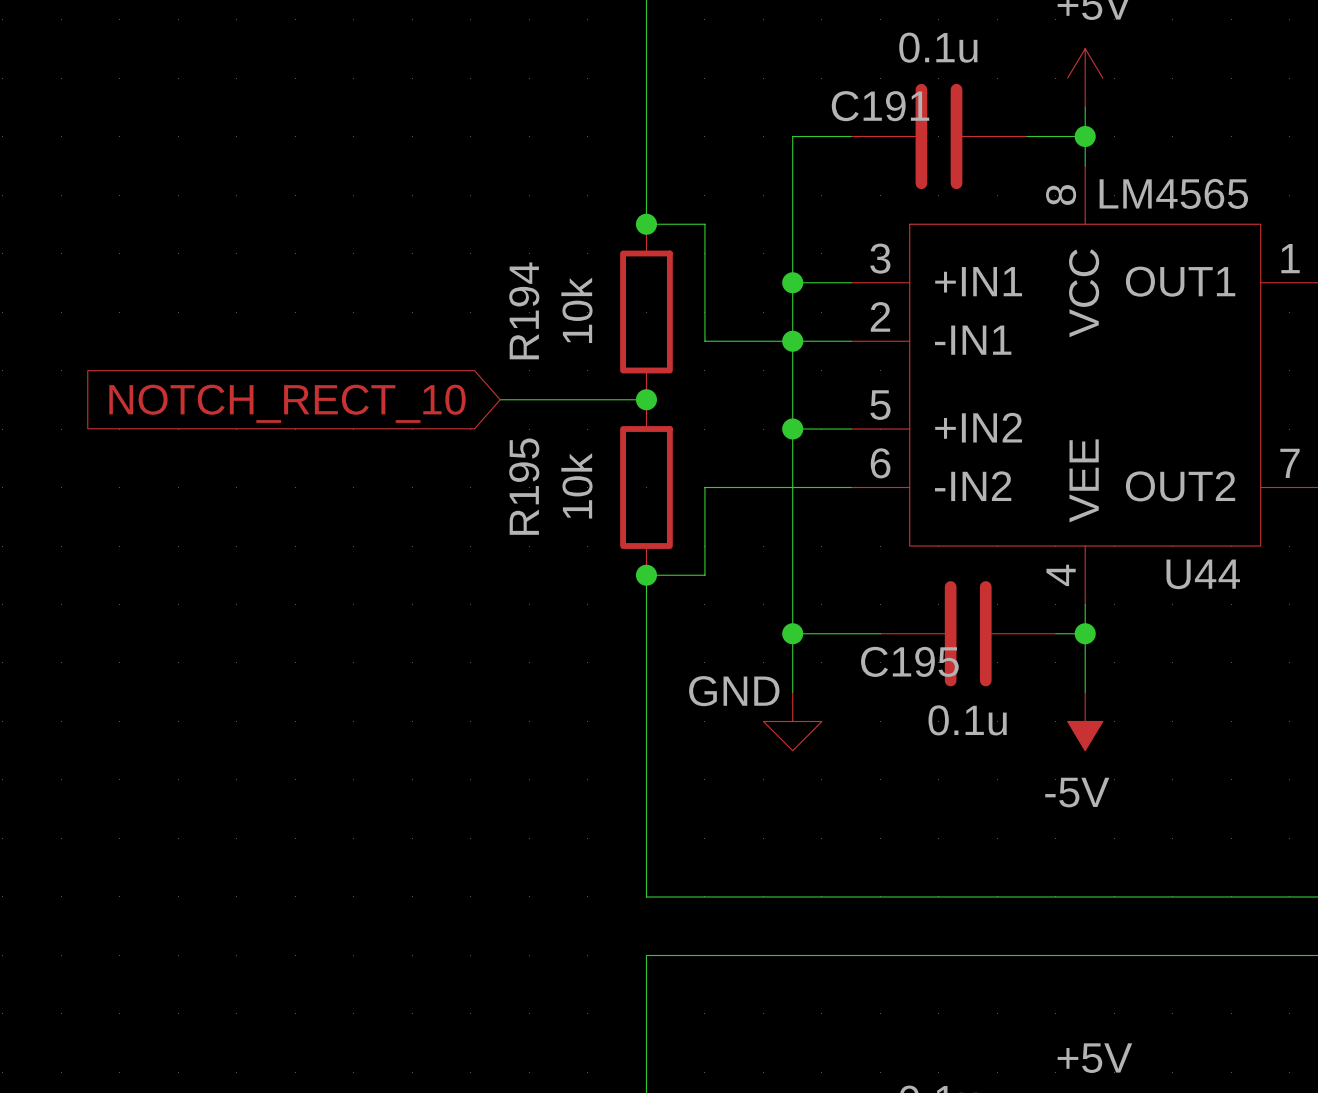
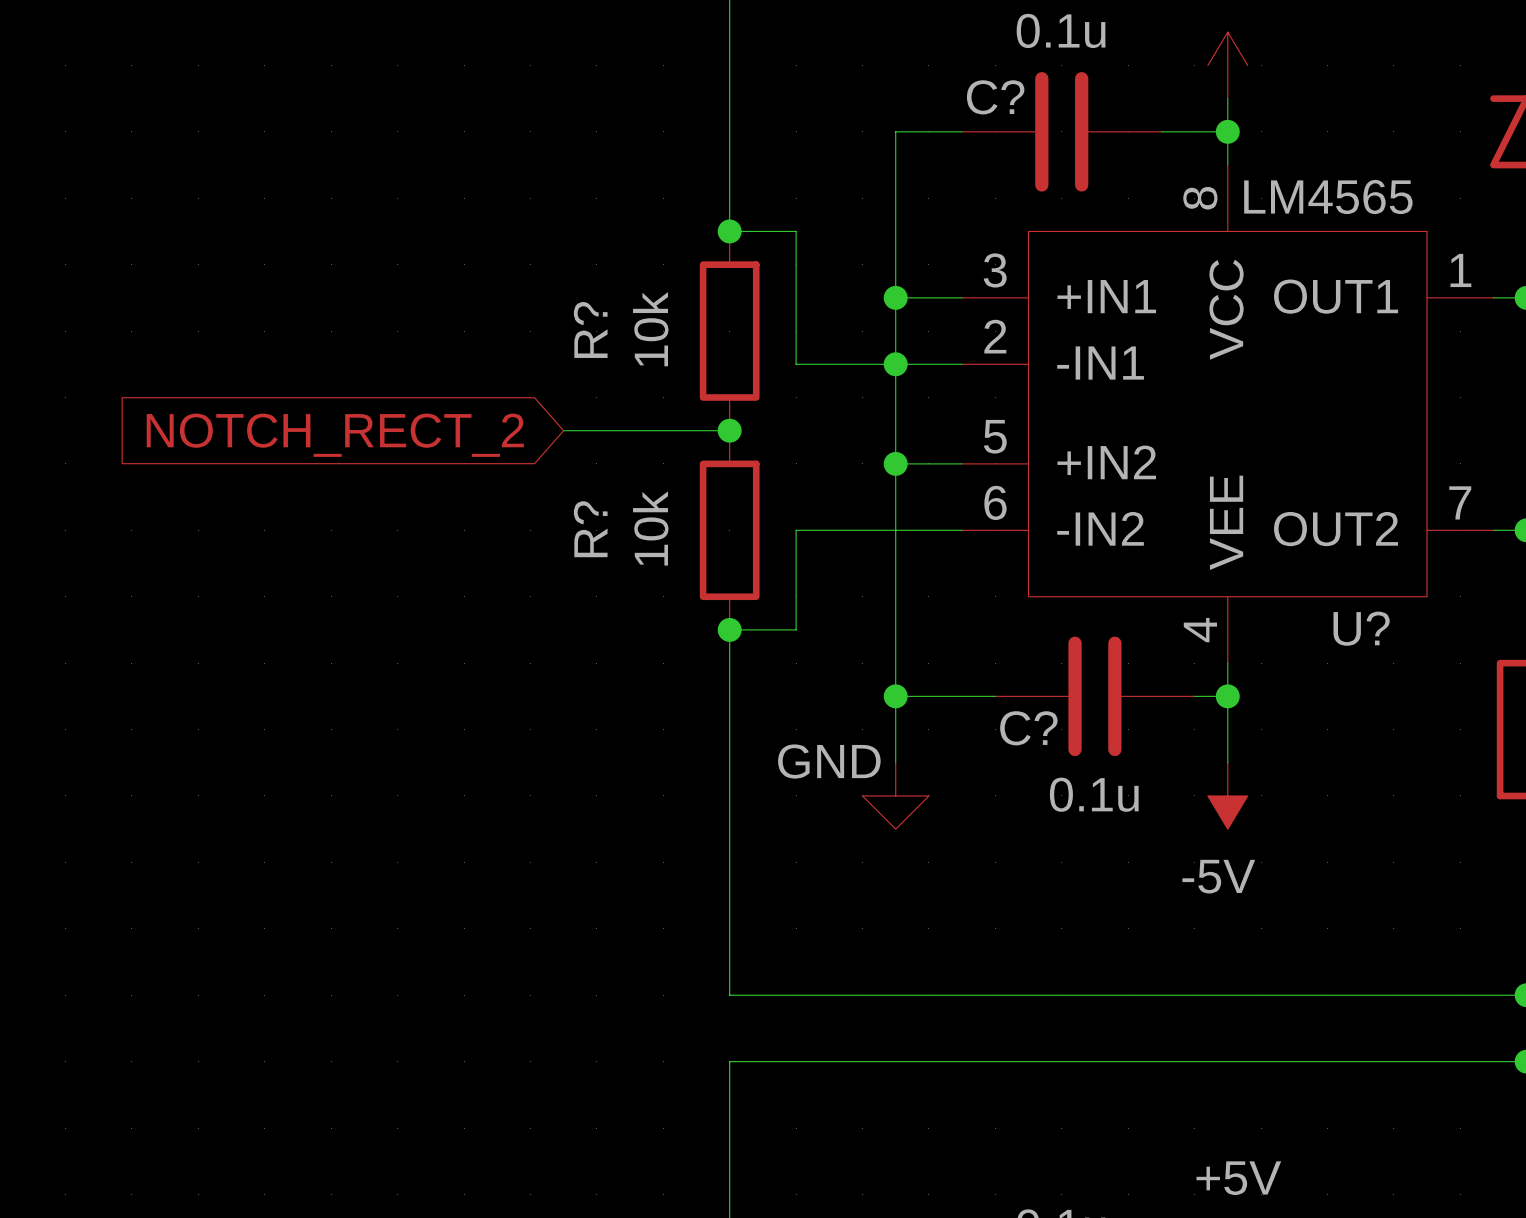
C191 name: C191 (880, 106) -> C? (995, 97)
R194 name: R194 (524, 310) -> R? (590, 329)
global label: NOTCH_RECT_10 (287, 403) -> NOTCH_RECT_2 (335, 435)
R195 name: R195 (524, 486) -> R? (590, 529)
U44 name: U44 (1203, 574) -> U? (1361, 628)
C195 name: C195 (909, 661) -> C? (1028, 728)

